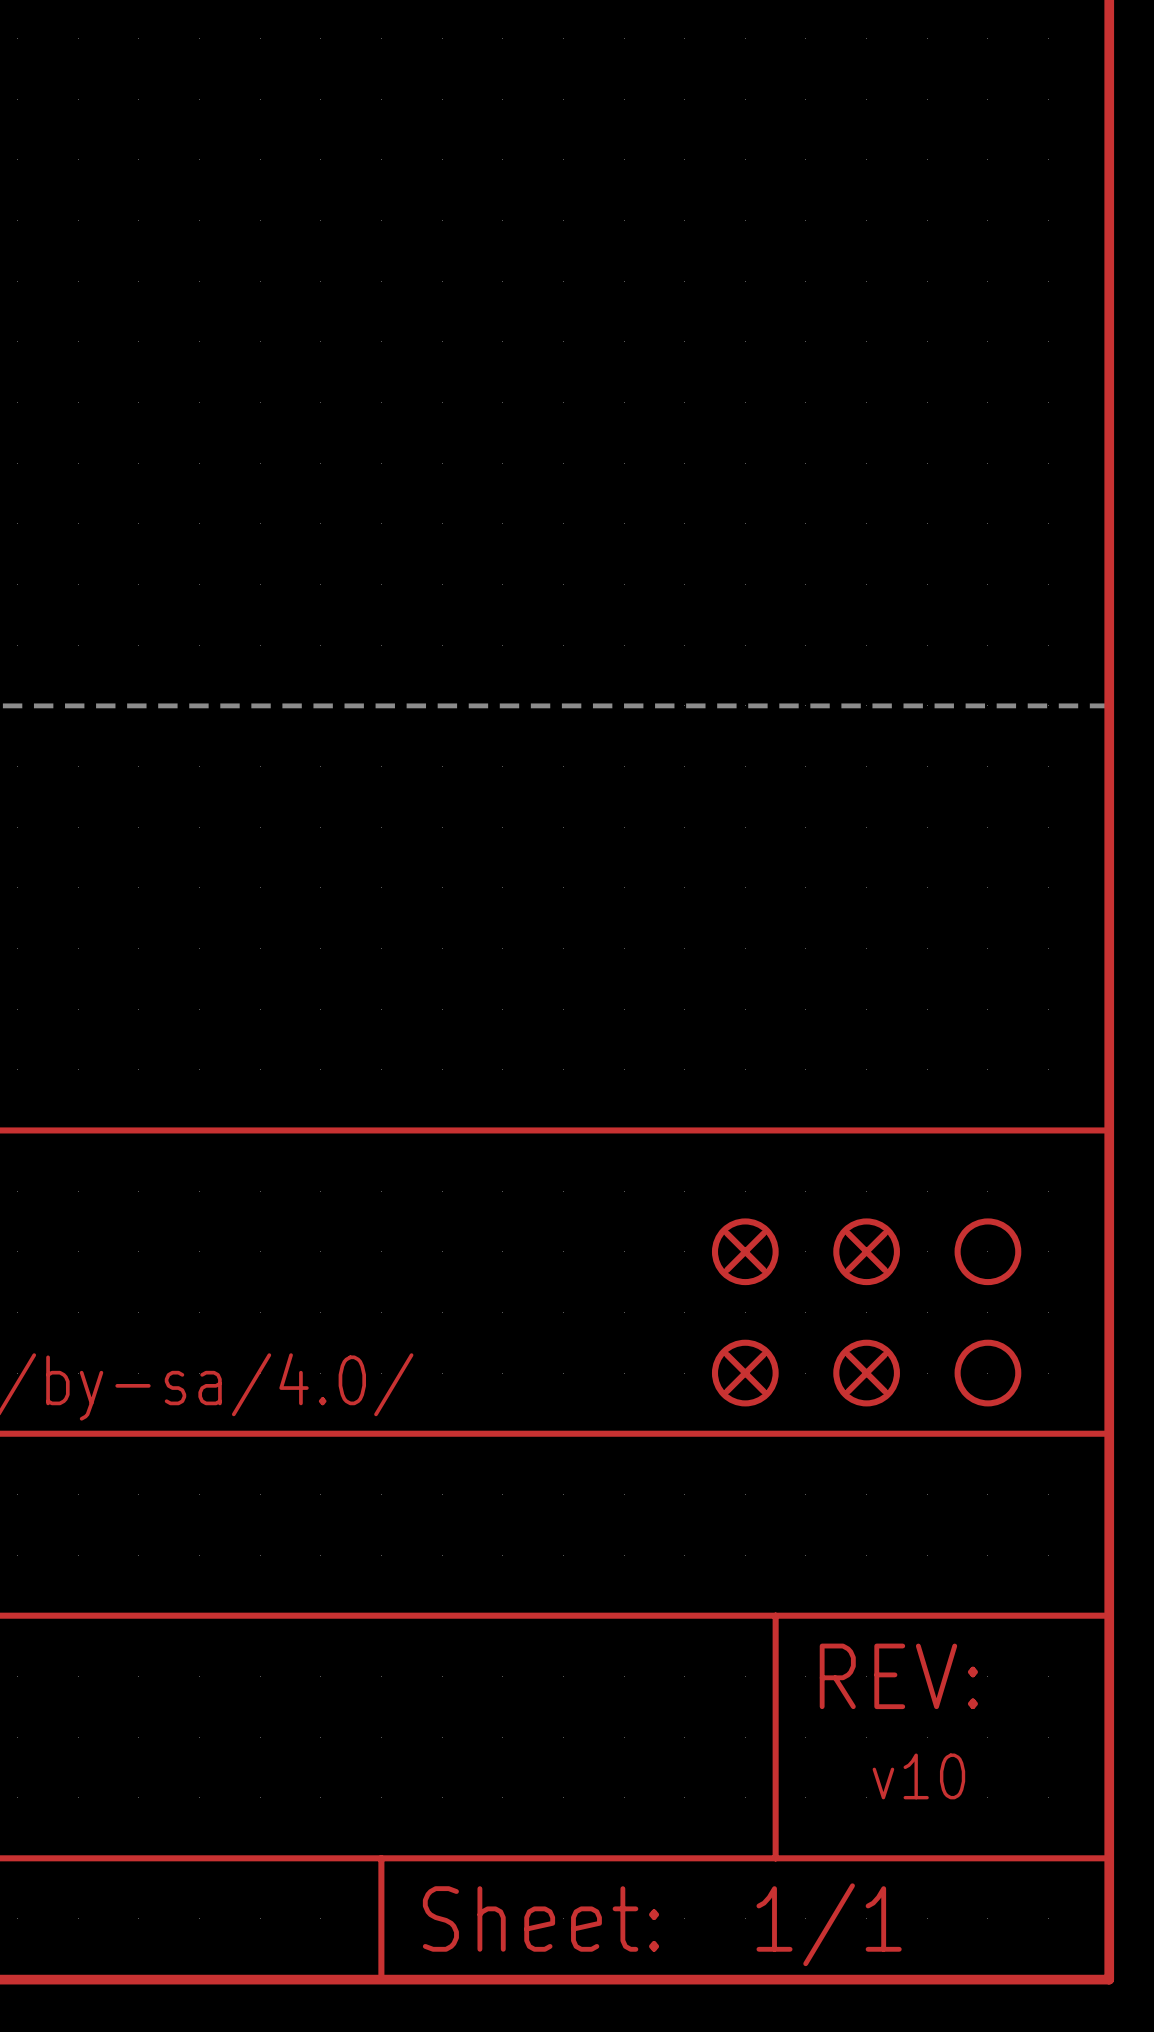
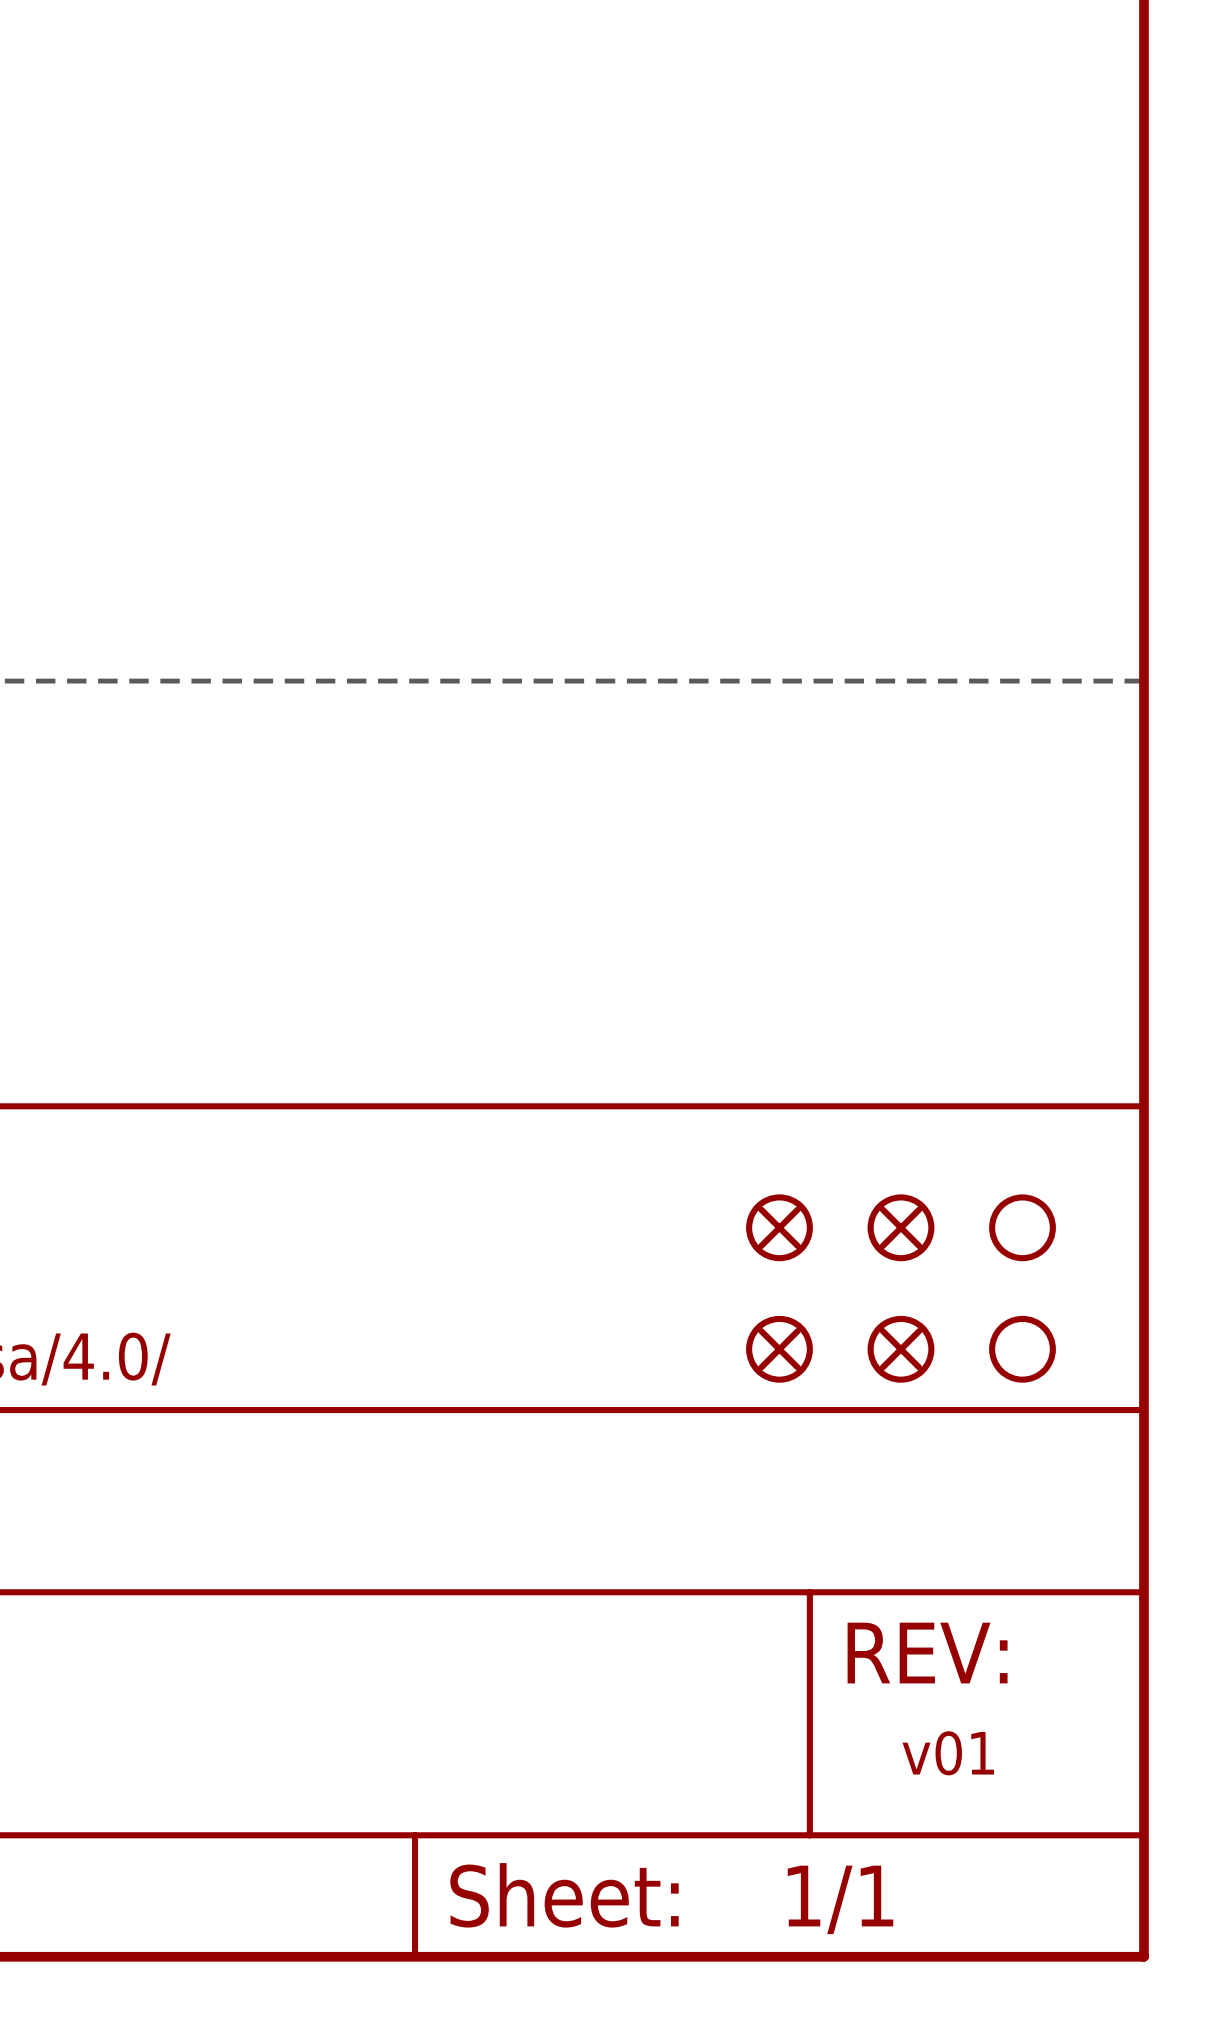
text: v10 (918, 1776) -> v01 (948, 1753)

